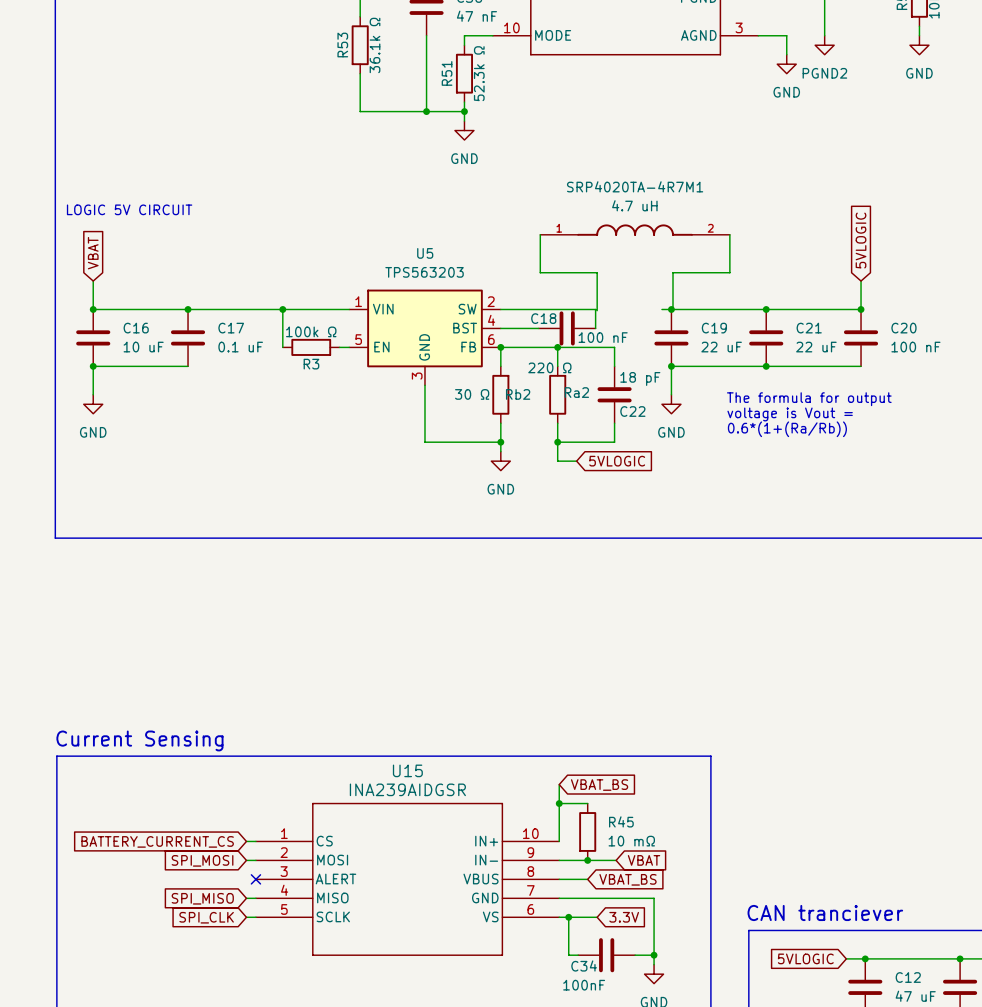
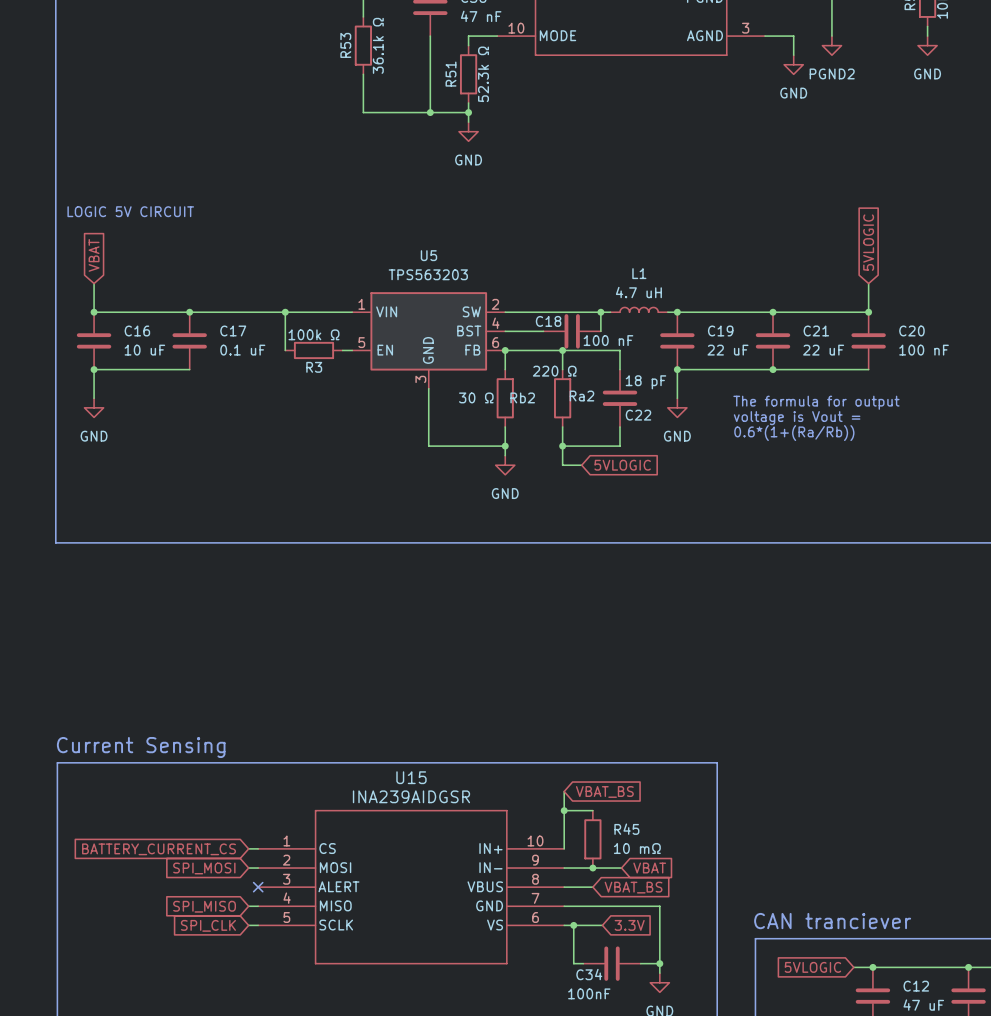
SRP4020TA-4R7M1: 4.7 uH (635, 230) -> none
wire: (540, 234) (540, 272) (597, 272) (597, 310) -> none
wire: (729, 234) (729, 272) (673, 272) (673, 310) -> none
L1: none -> 4.7 uH (639, 309)
wire: none -> (600, 312) (610, 312)
junction: none -> (600, 312)

